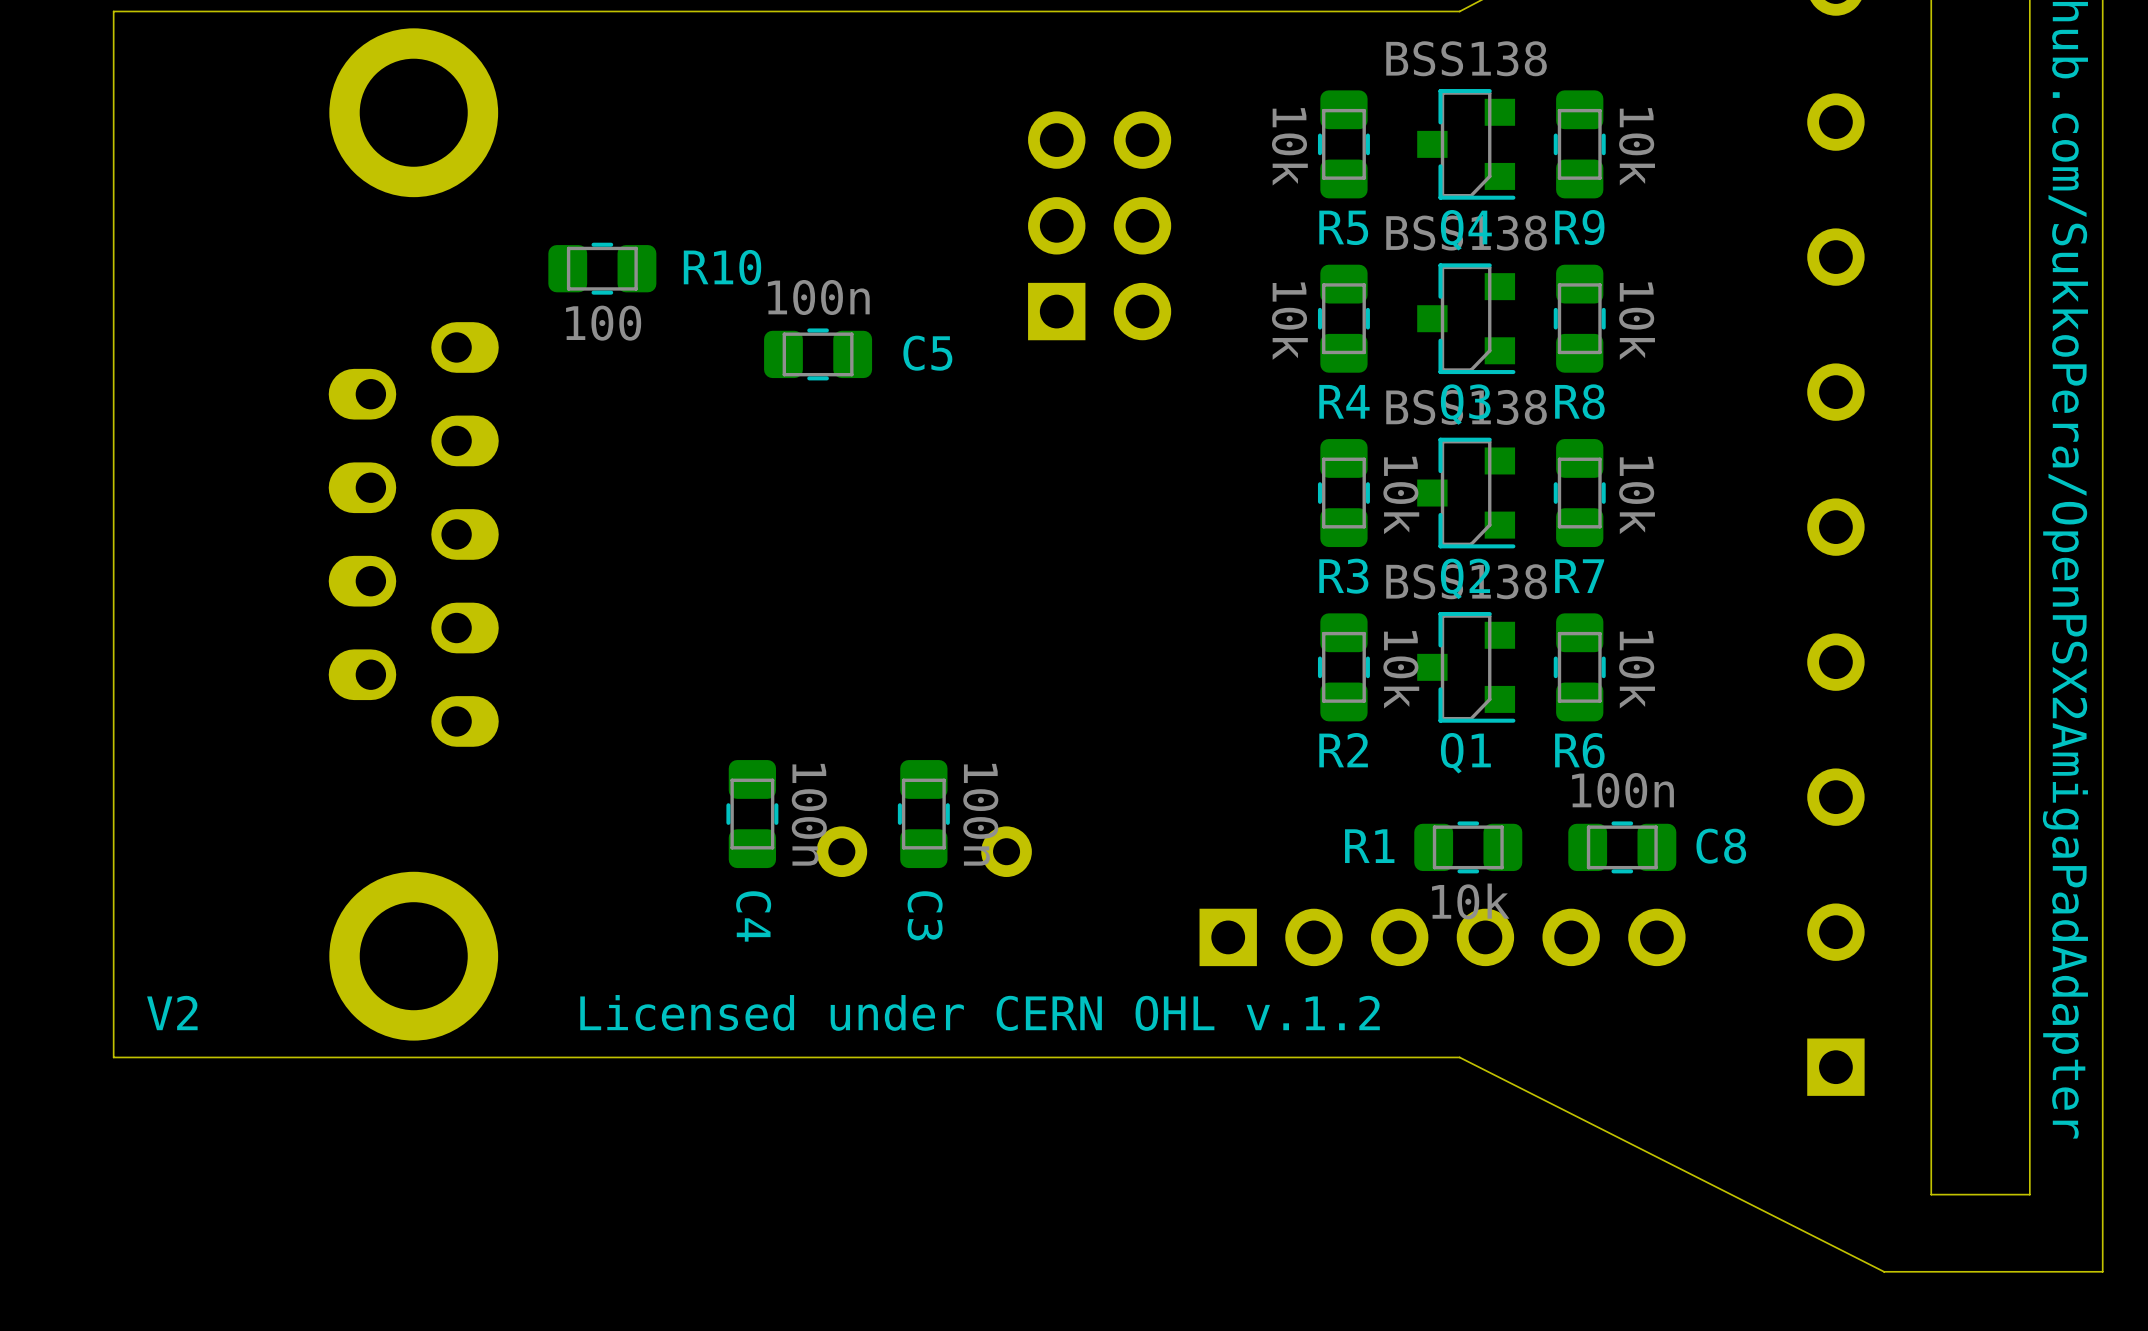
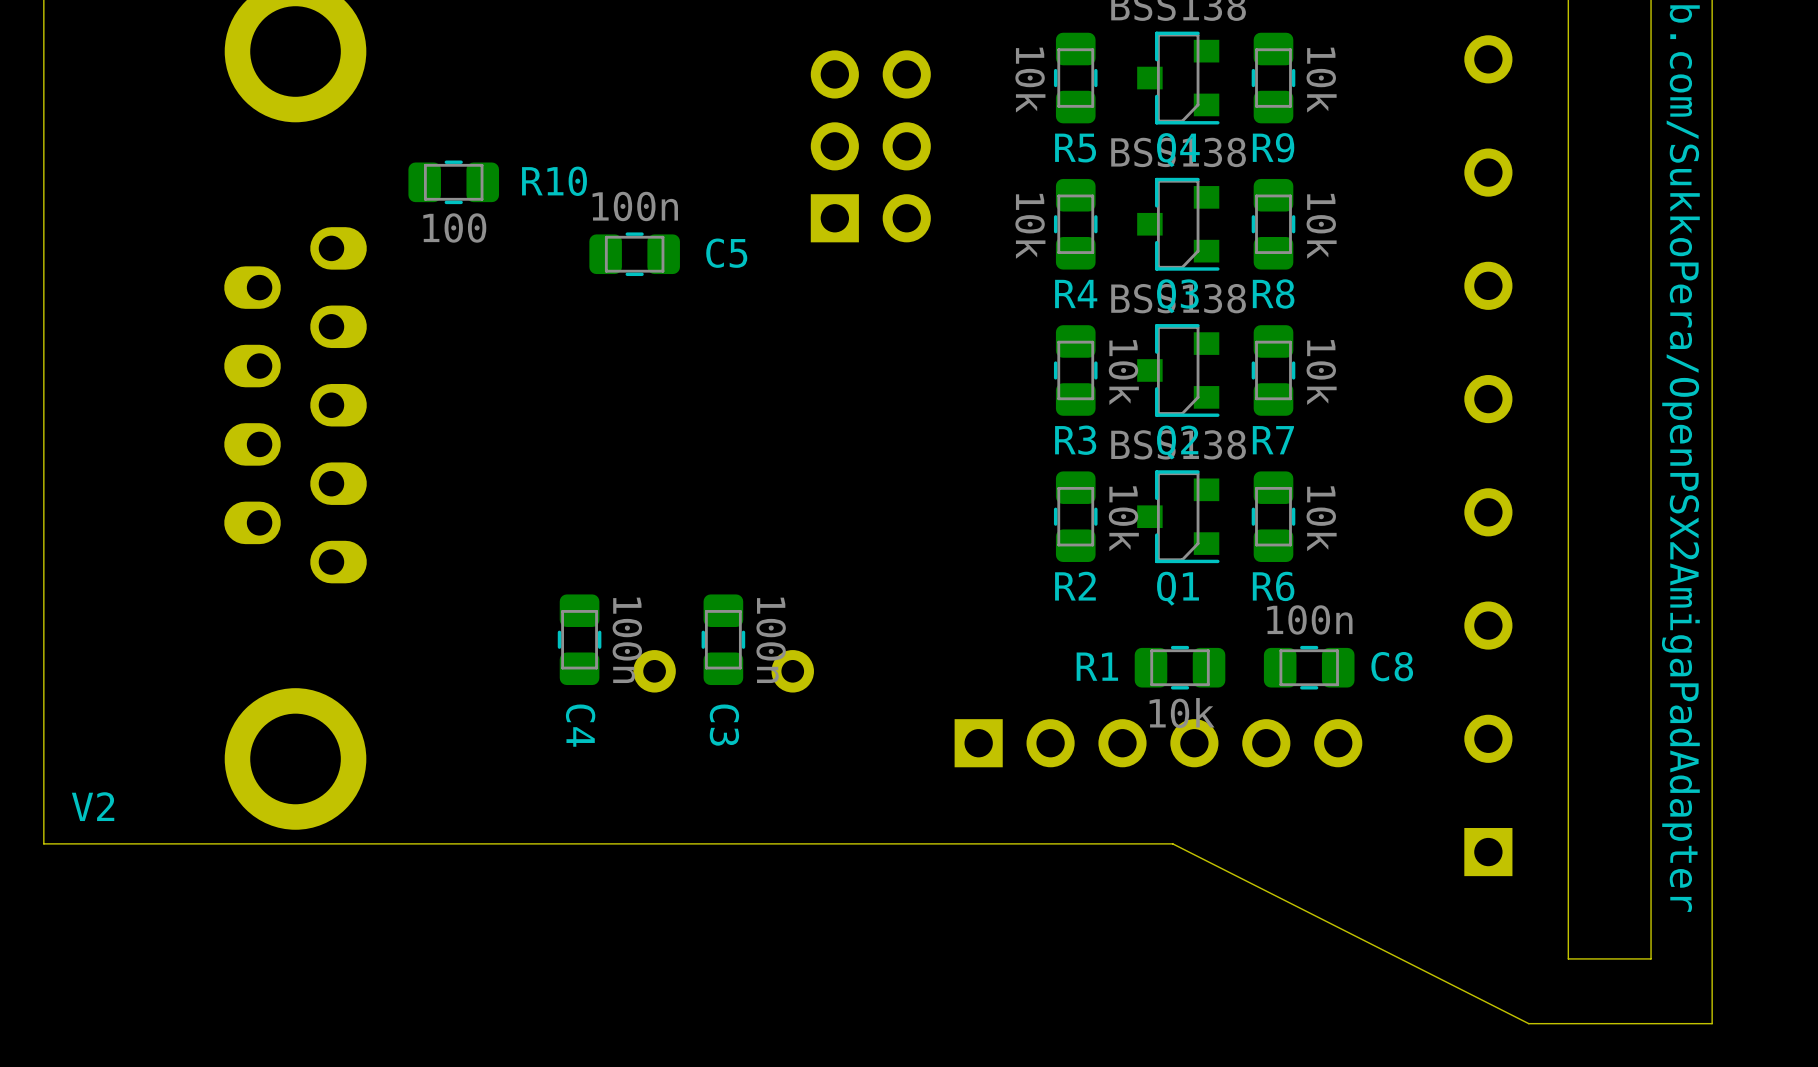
text: Licensed under CERN OHL v.1.2 (980, 1012) -> none

